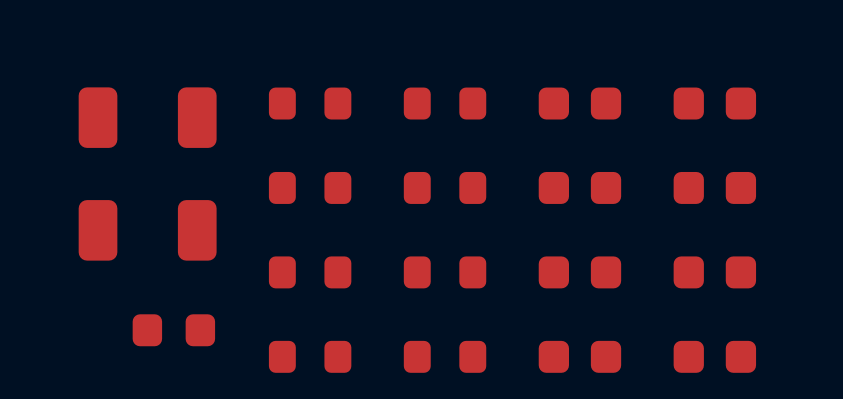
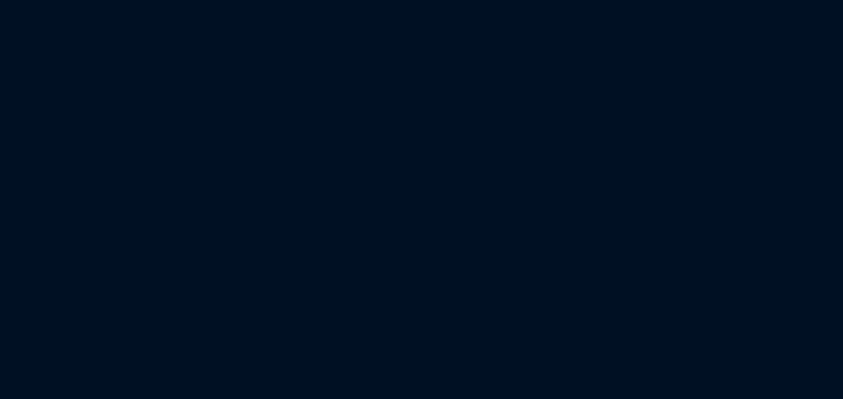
part: (310, 103) -> none
part: (445, 103) -> none
part: (579, 103) -> none
part: (714, 103) -> none
part: (147, 117) -> none
part: (310, 187) -> none
part: (445, 187) -> none
part: (579, 187) -> none
part: (714, 187) -> none
part: (147, 230) -> none
part: (310, 272) -> none
part: (445, 272) -> none
part: (579, 272) -> none
part: (714, 272) -> none
part: (173, 330) -> none
part: (310, 356) -> none
part: (445, 356) -> none
part: (579, 356) -> none
part: (714, 356) -> none

